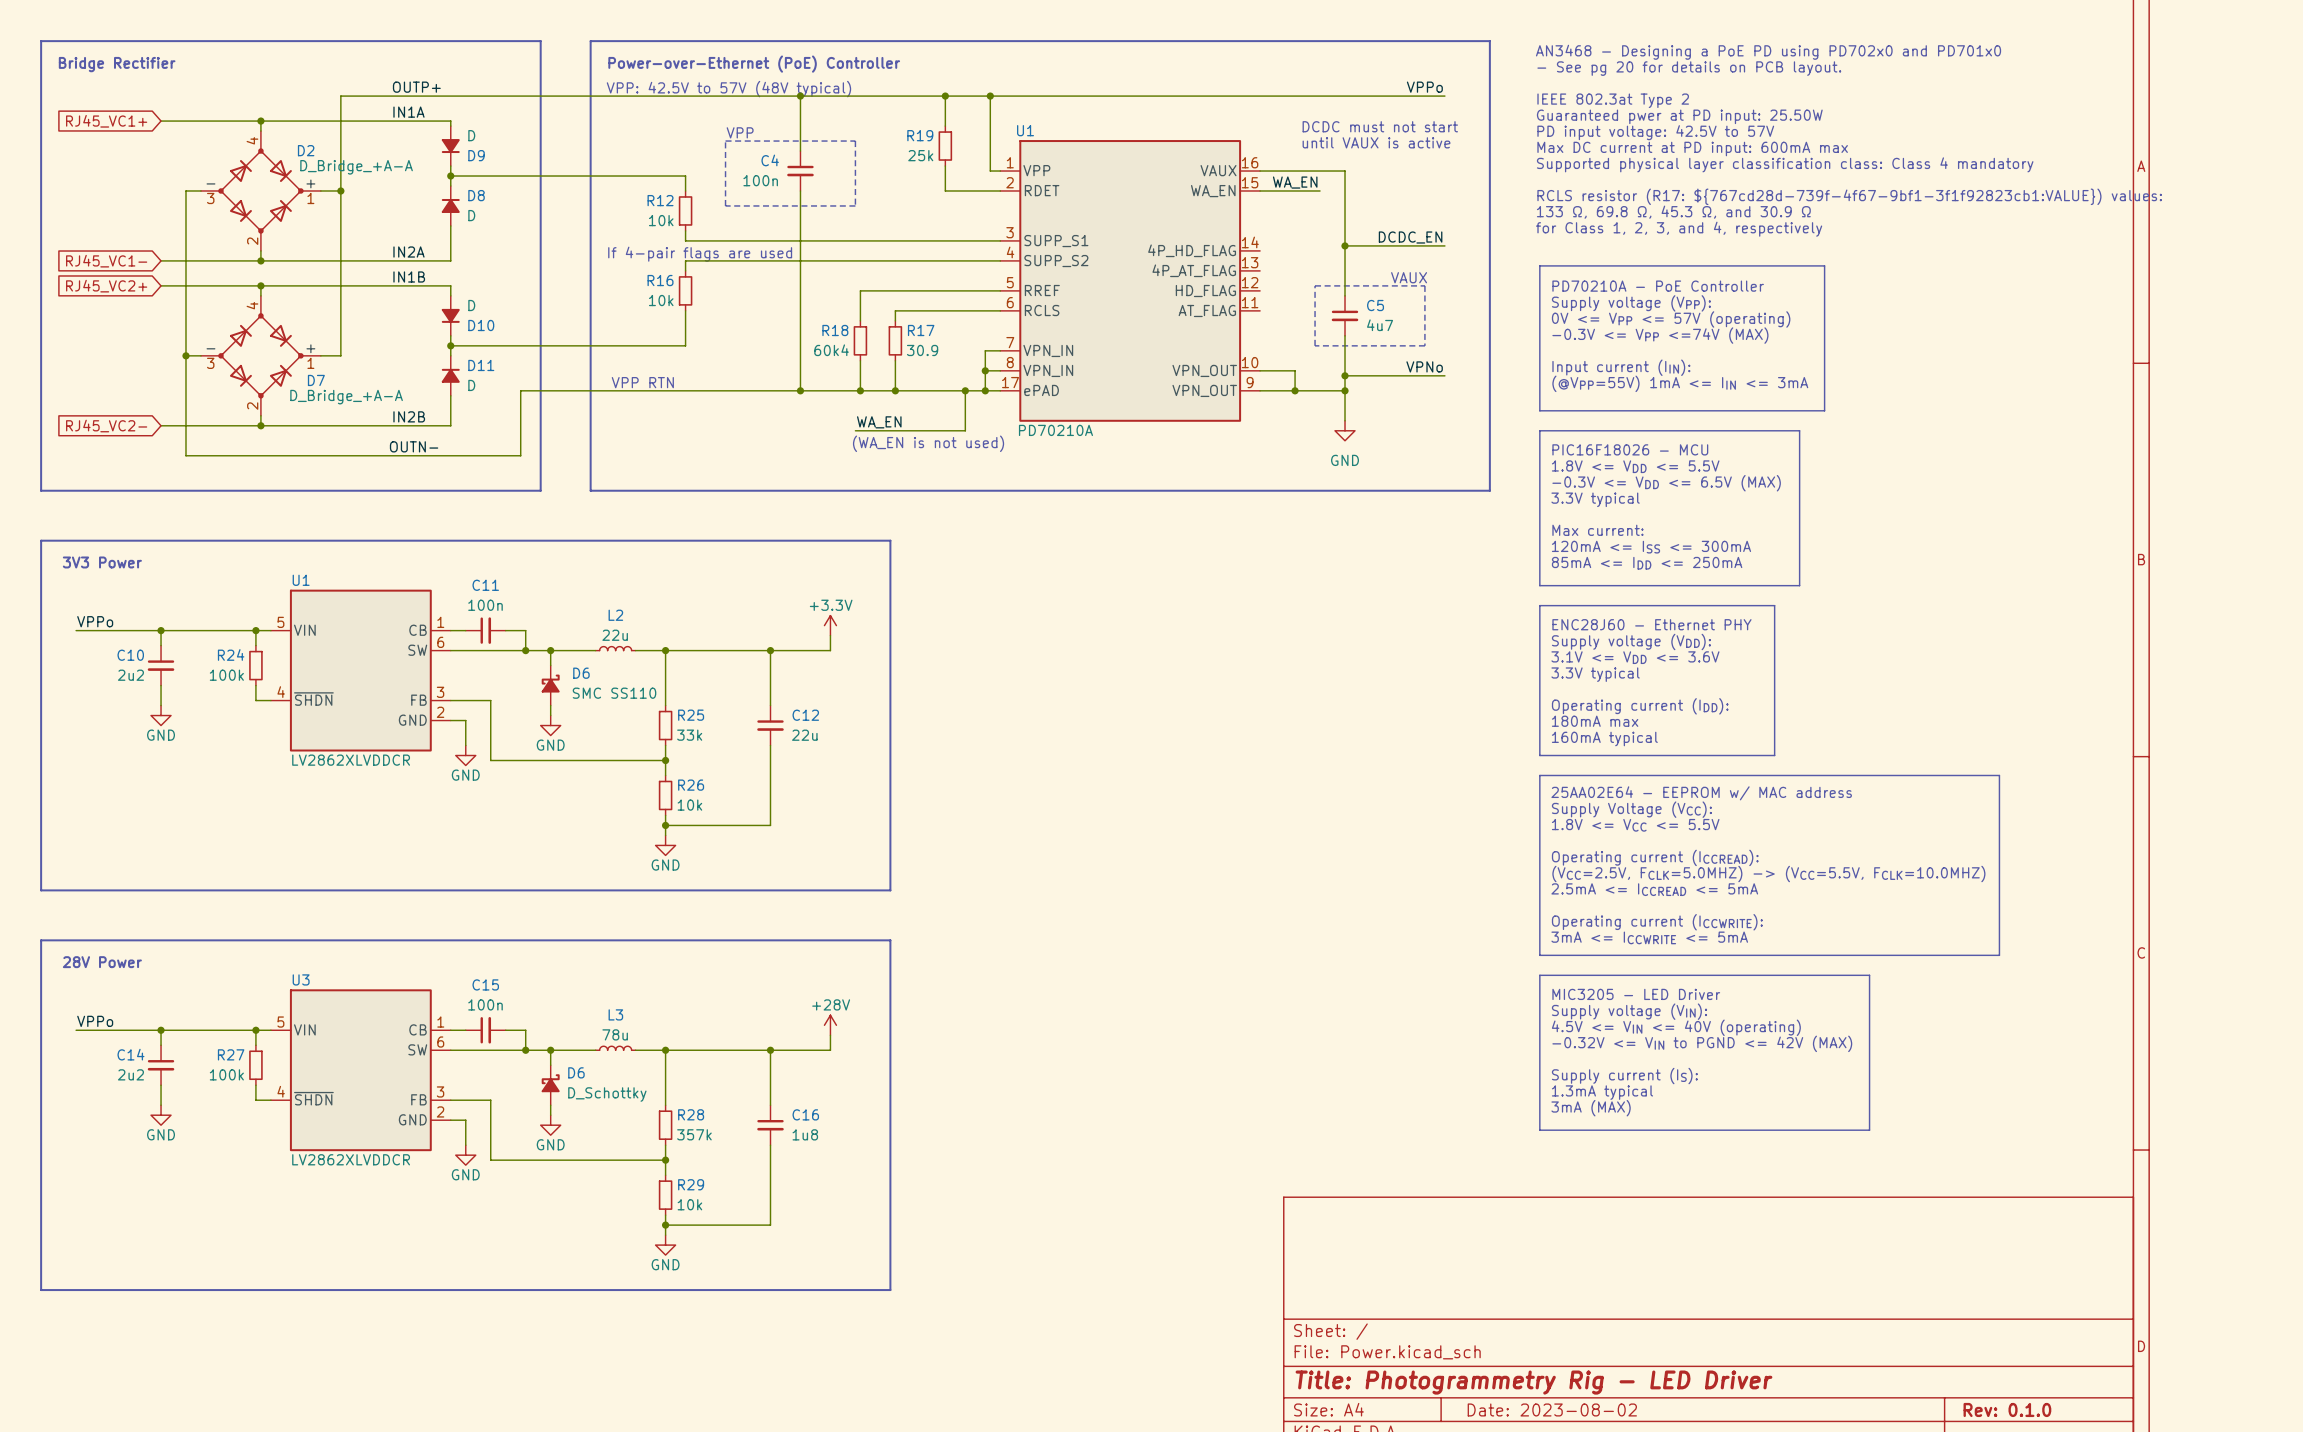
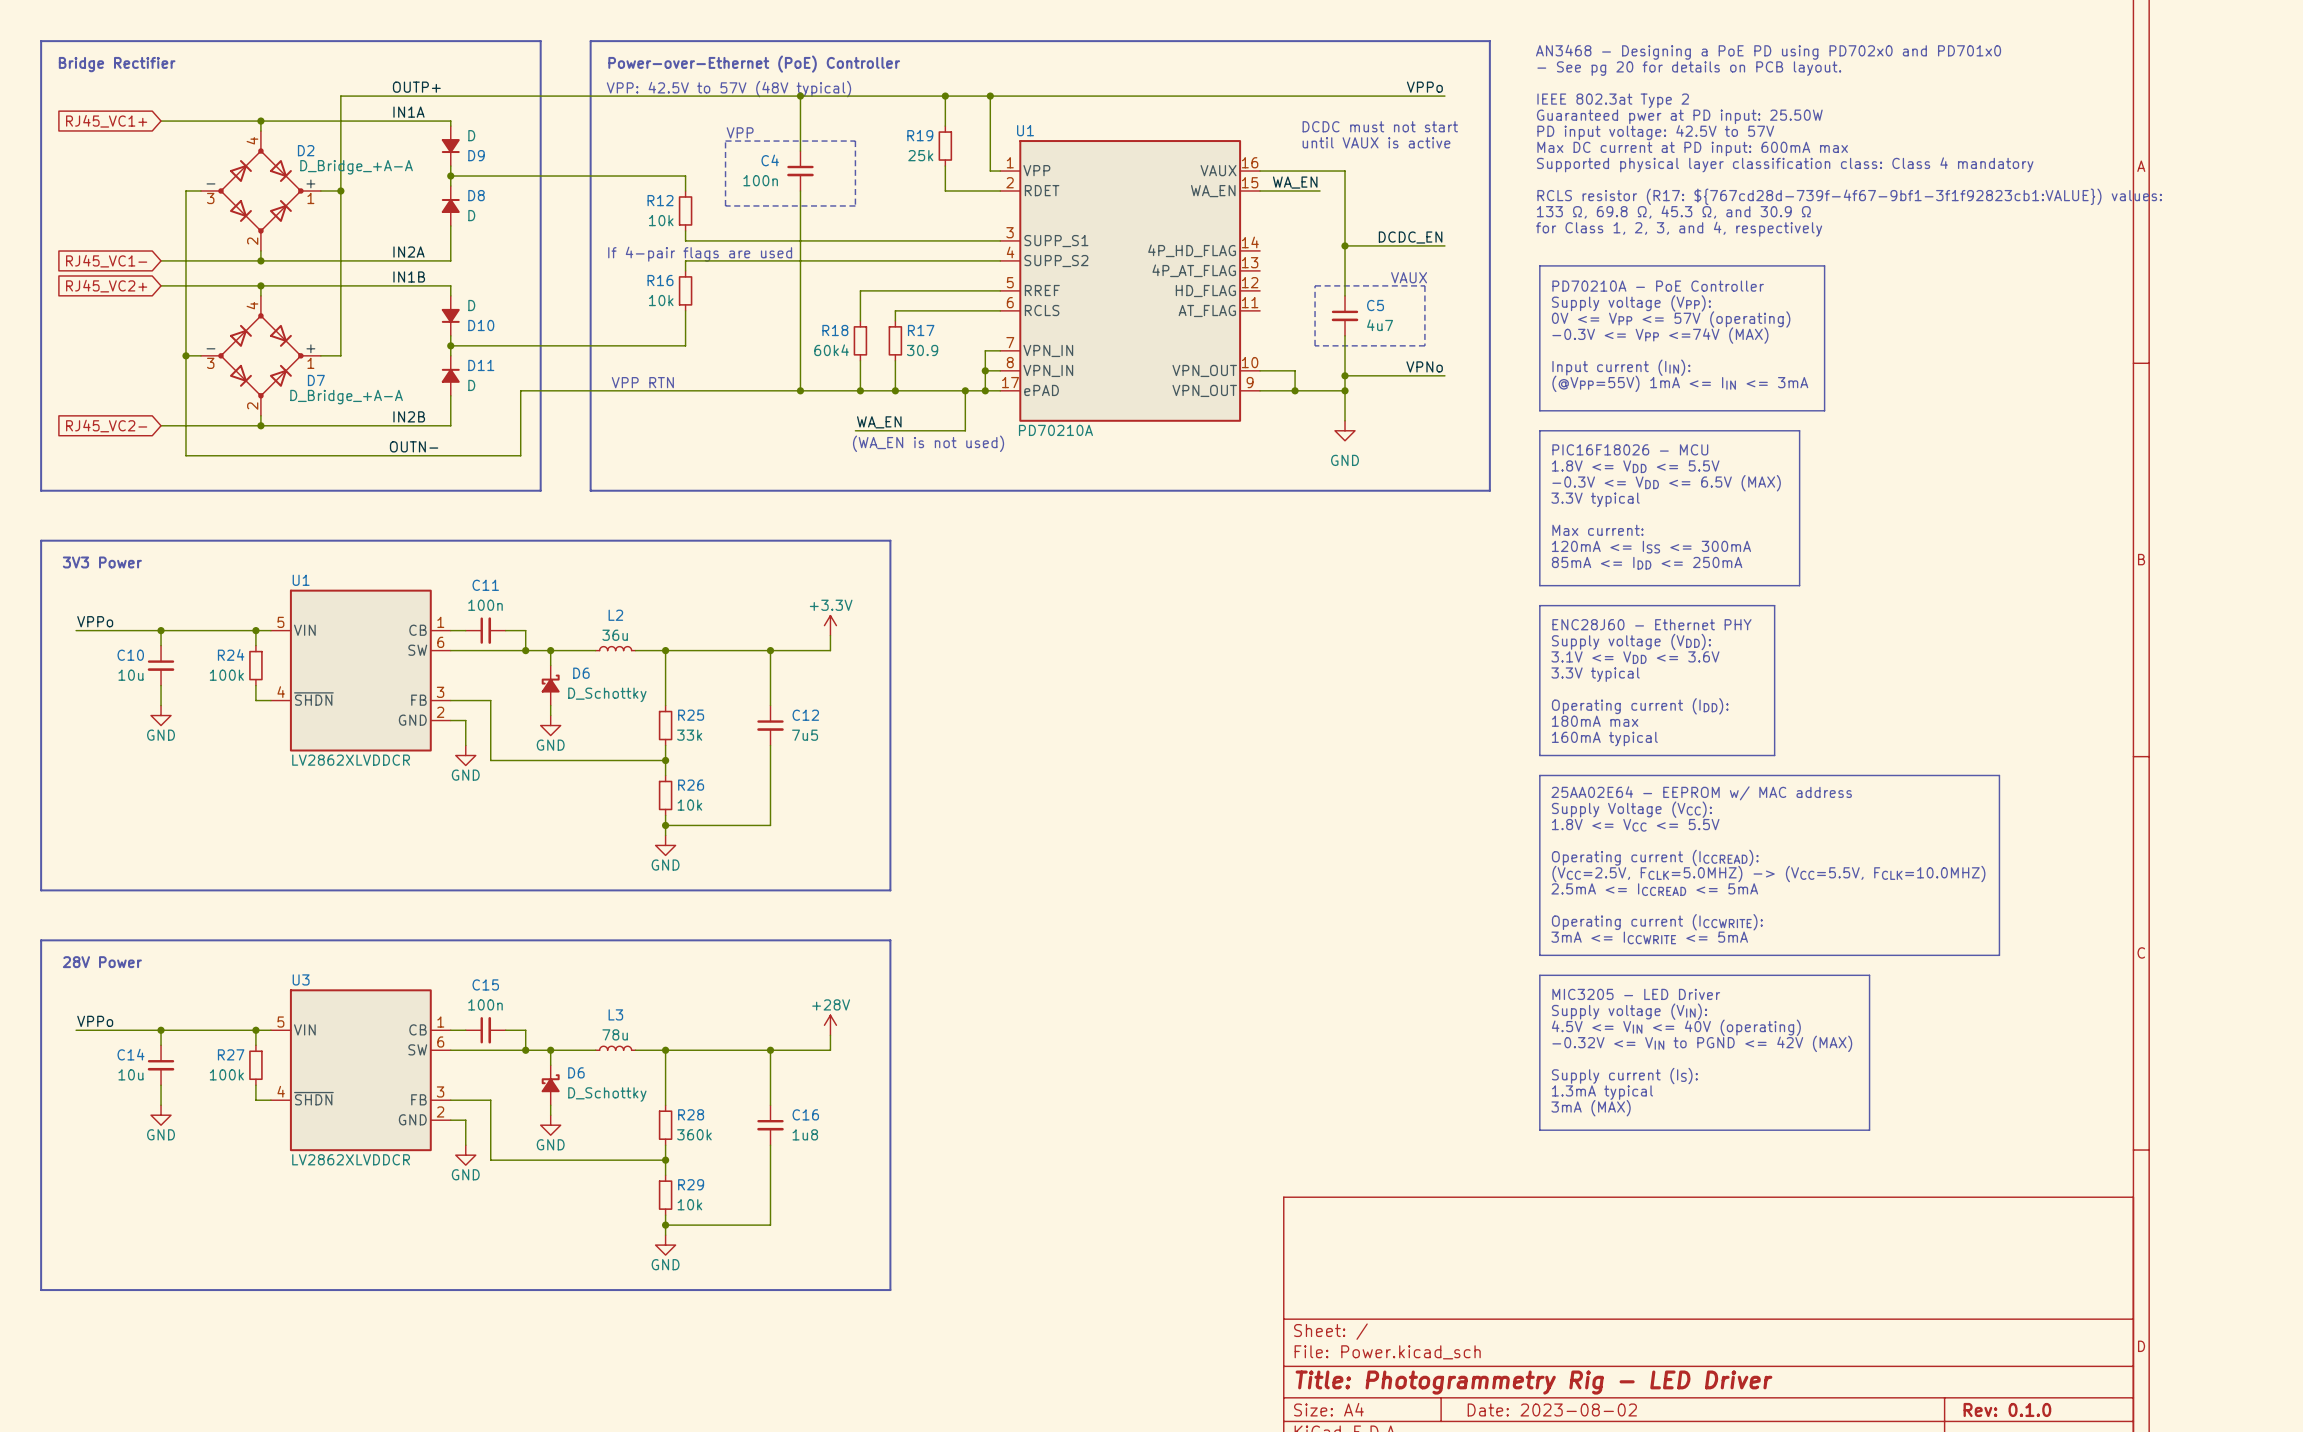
L2 value: 22u (615, 635) -> 36u (615, 635)
C10 value: 2u2 (130, 675) -> 10u (130, 675)
D6 value: SMC SS110 (614, 693) -> D_Schottky (607, 694)
C12 value: 22u (804, 735) -> 7u5 (805, 735)
C14 value: 2u2 (130, 1074) -> 10u (130, 1074)
R28 value: 357k (694, 1134) -> 360k (694, 1134)

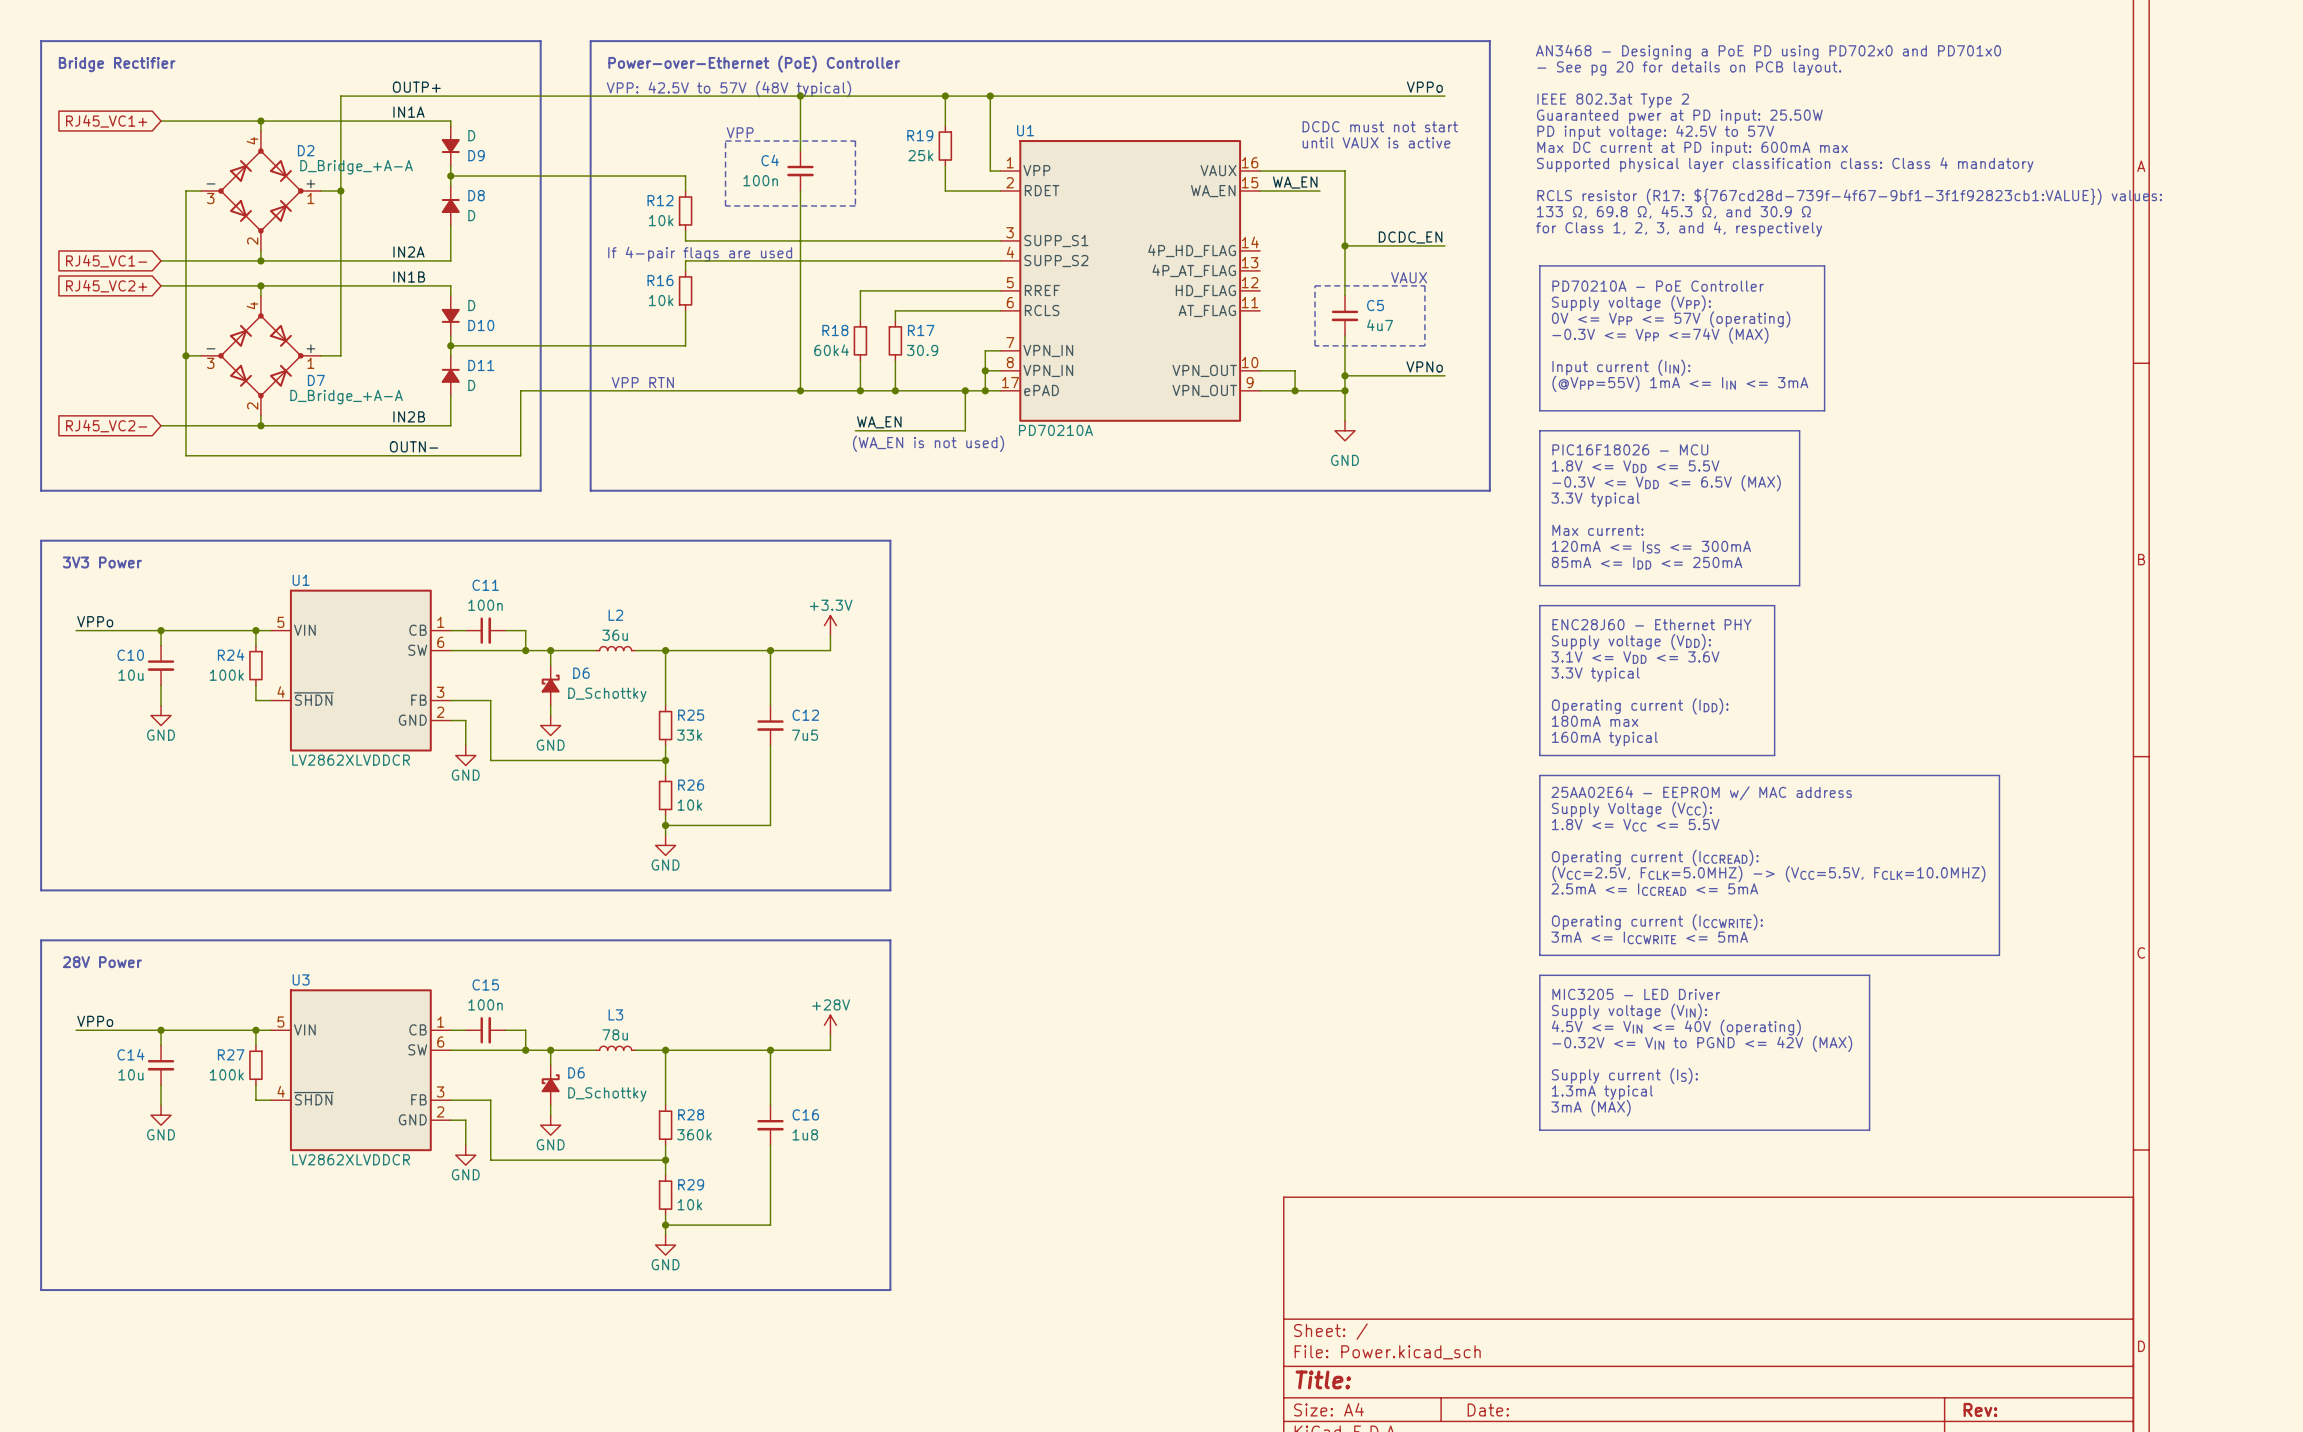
title block: Title: Photogrammetry Rig - LED Driver (1533, 1382) -> Title: (1323, 1379)
title block: Date: 2023-08-02 (1552, 1409) -> Date: (1488, 1409)
title block: Rev: 0.1.0 (2007, 1409) -> Rev: (1980, 1409)

